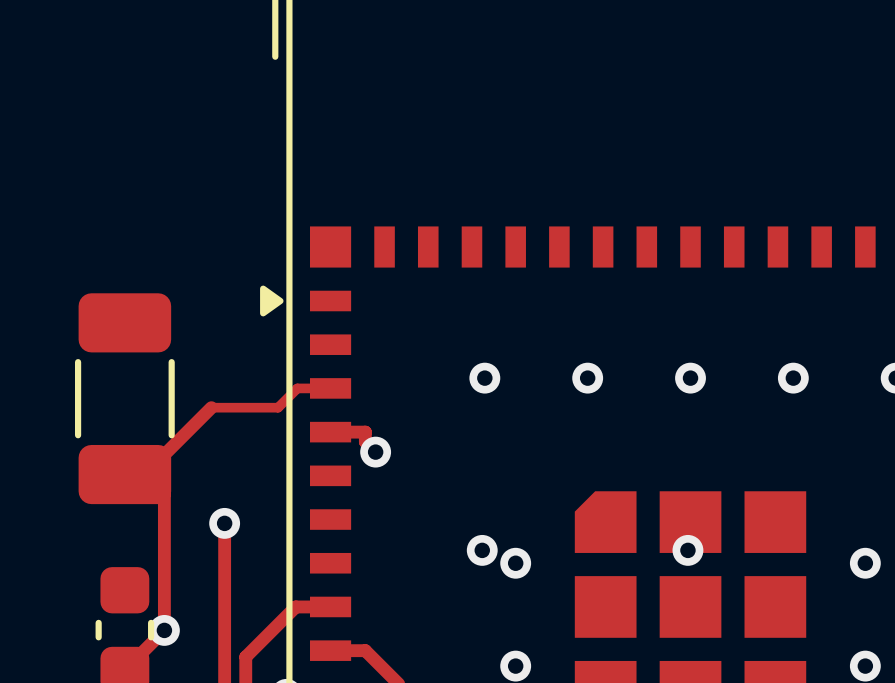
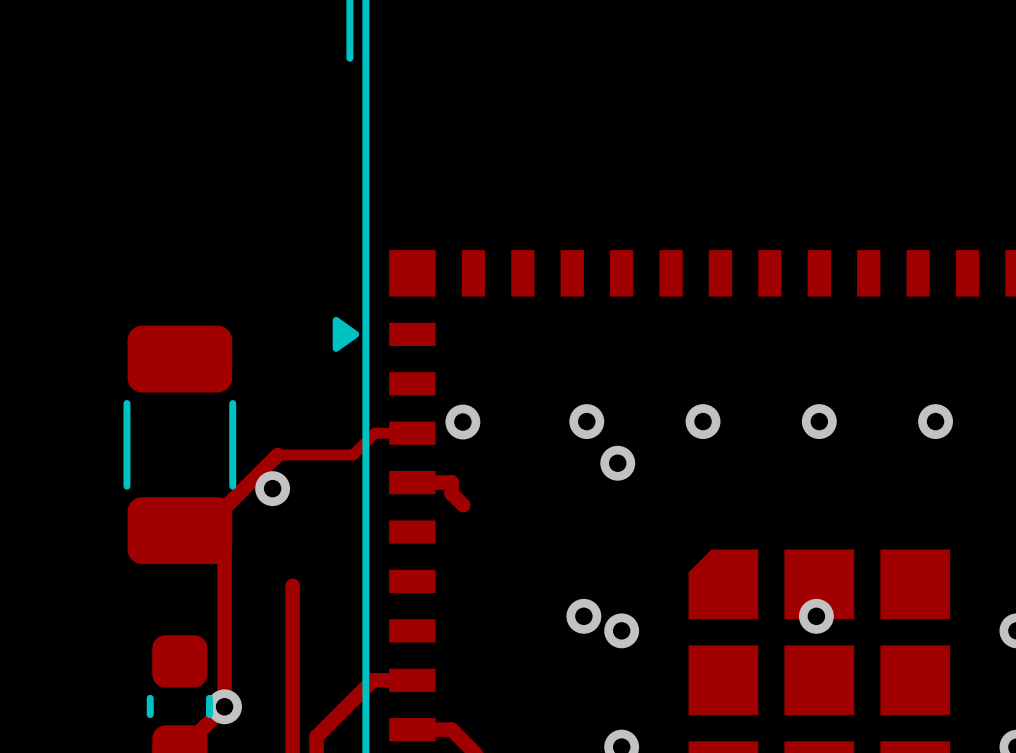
via: none -> (462, 422)
via: none -> (617, 463)
via: none -> (272, 488)
via: (375, 452) -> none
via: (224, 523) -> none

